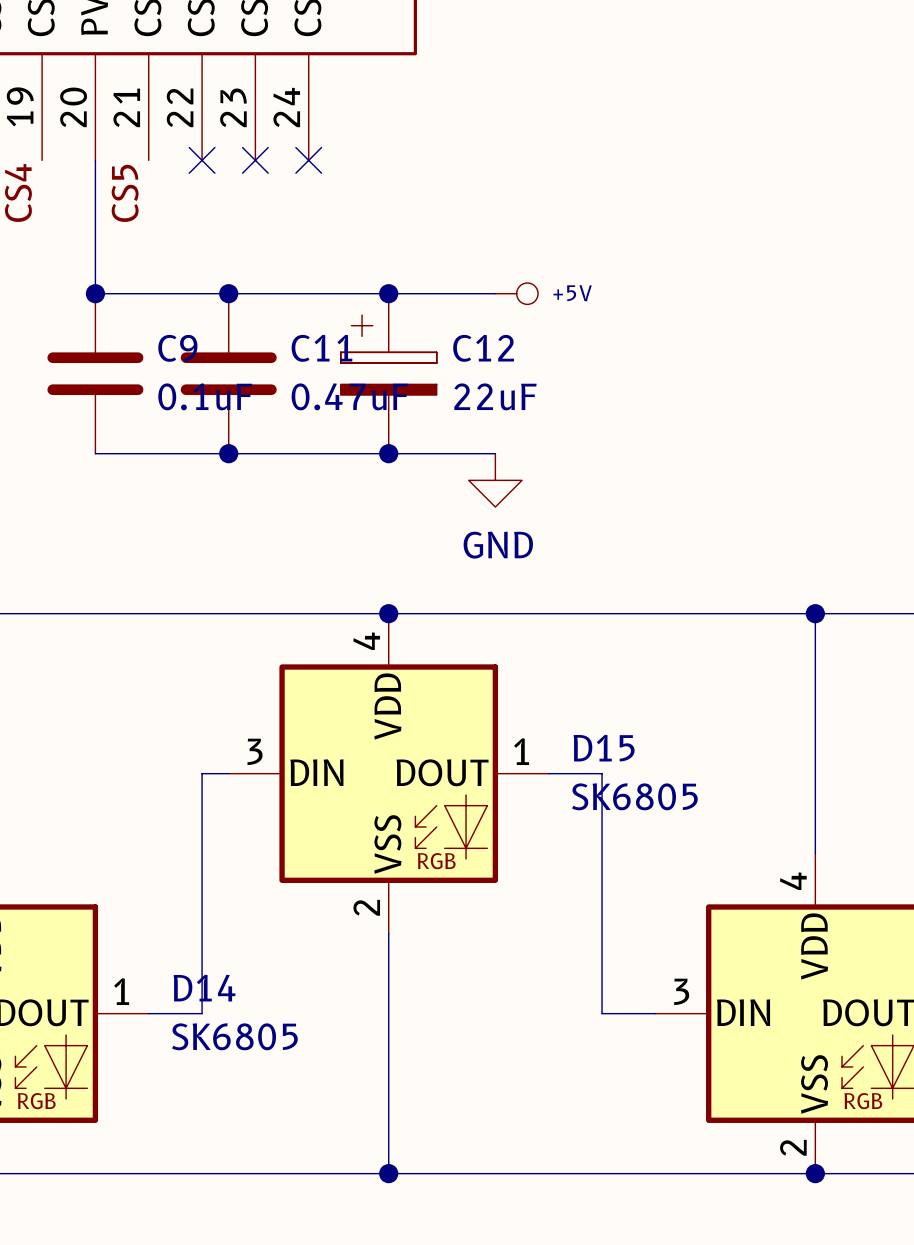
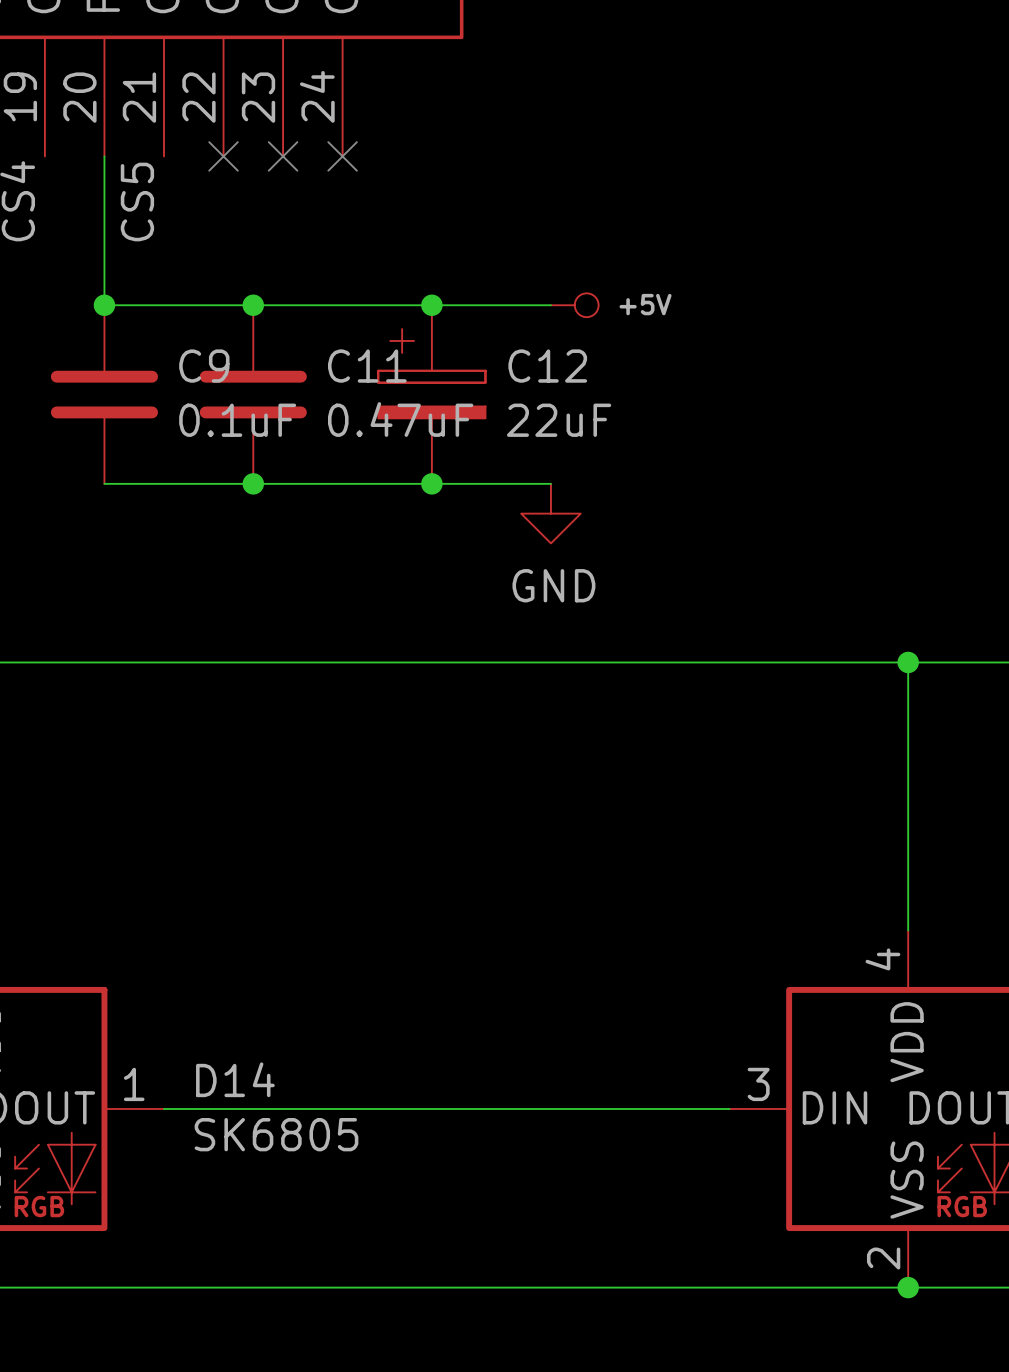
junction: (388, 613) -> none
wire: (228, 773) (202, 773) (202, 1013) -> none
D15: SK6805 (388, 773) -> none
wire: (548, 773) (602, 773) (602, 1013) -> (223, 1108) (670, 1108)
wire: (388, 933) (388, 1173) -> none
junction: (388, 1173) -> none

